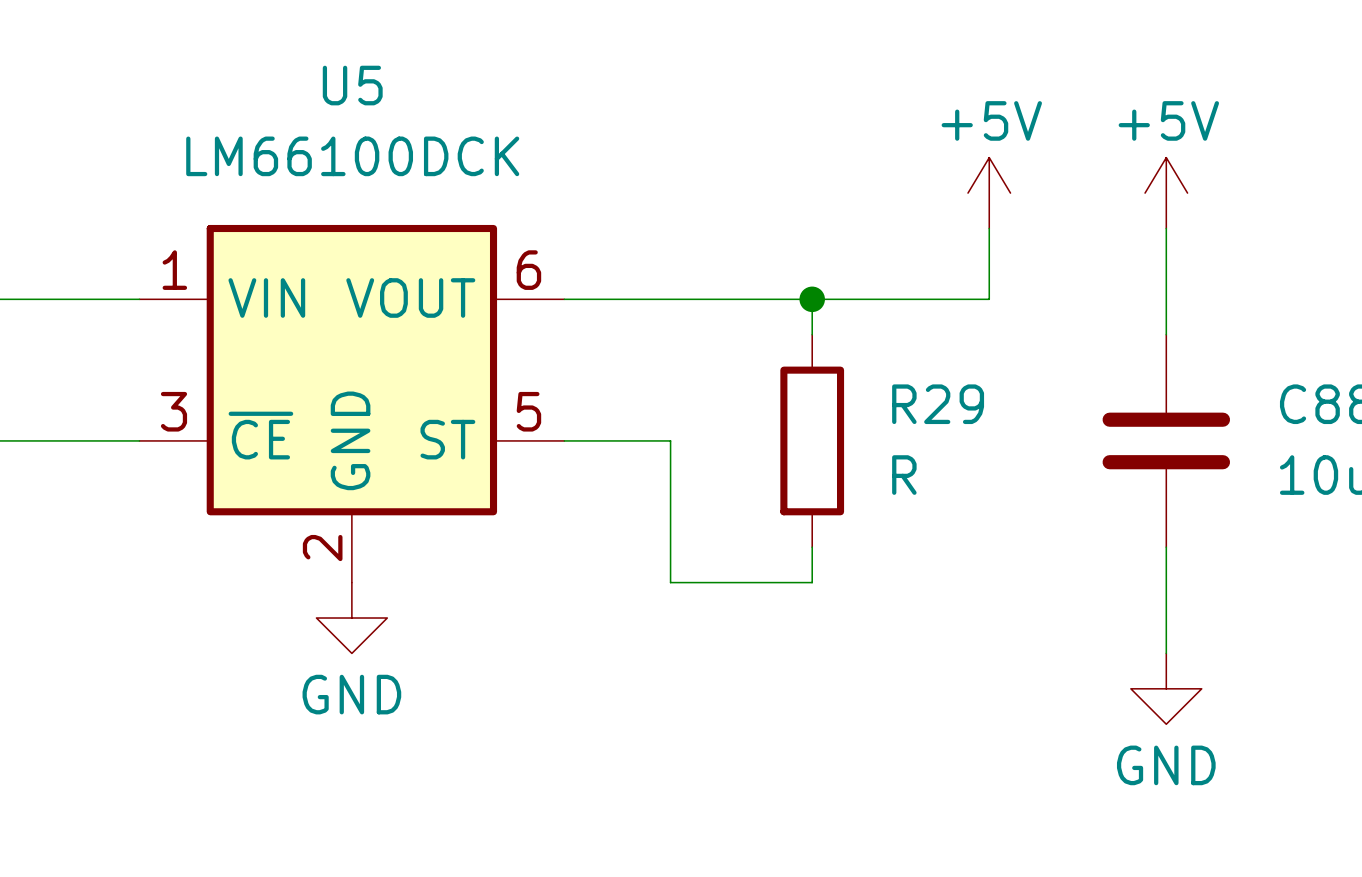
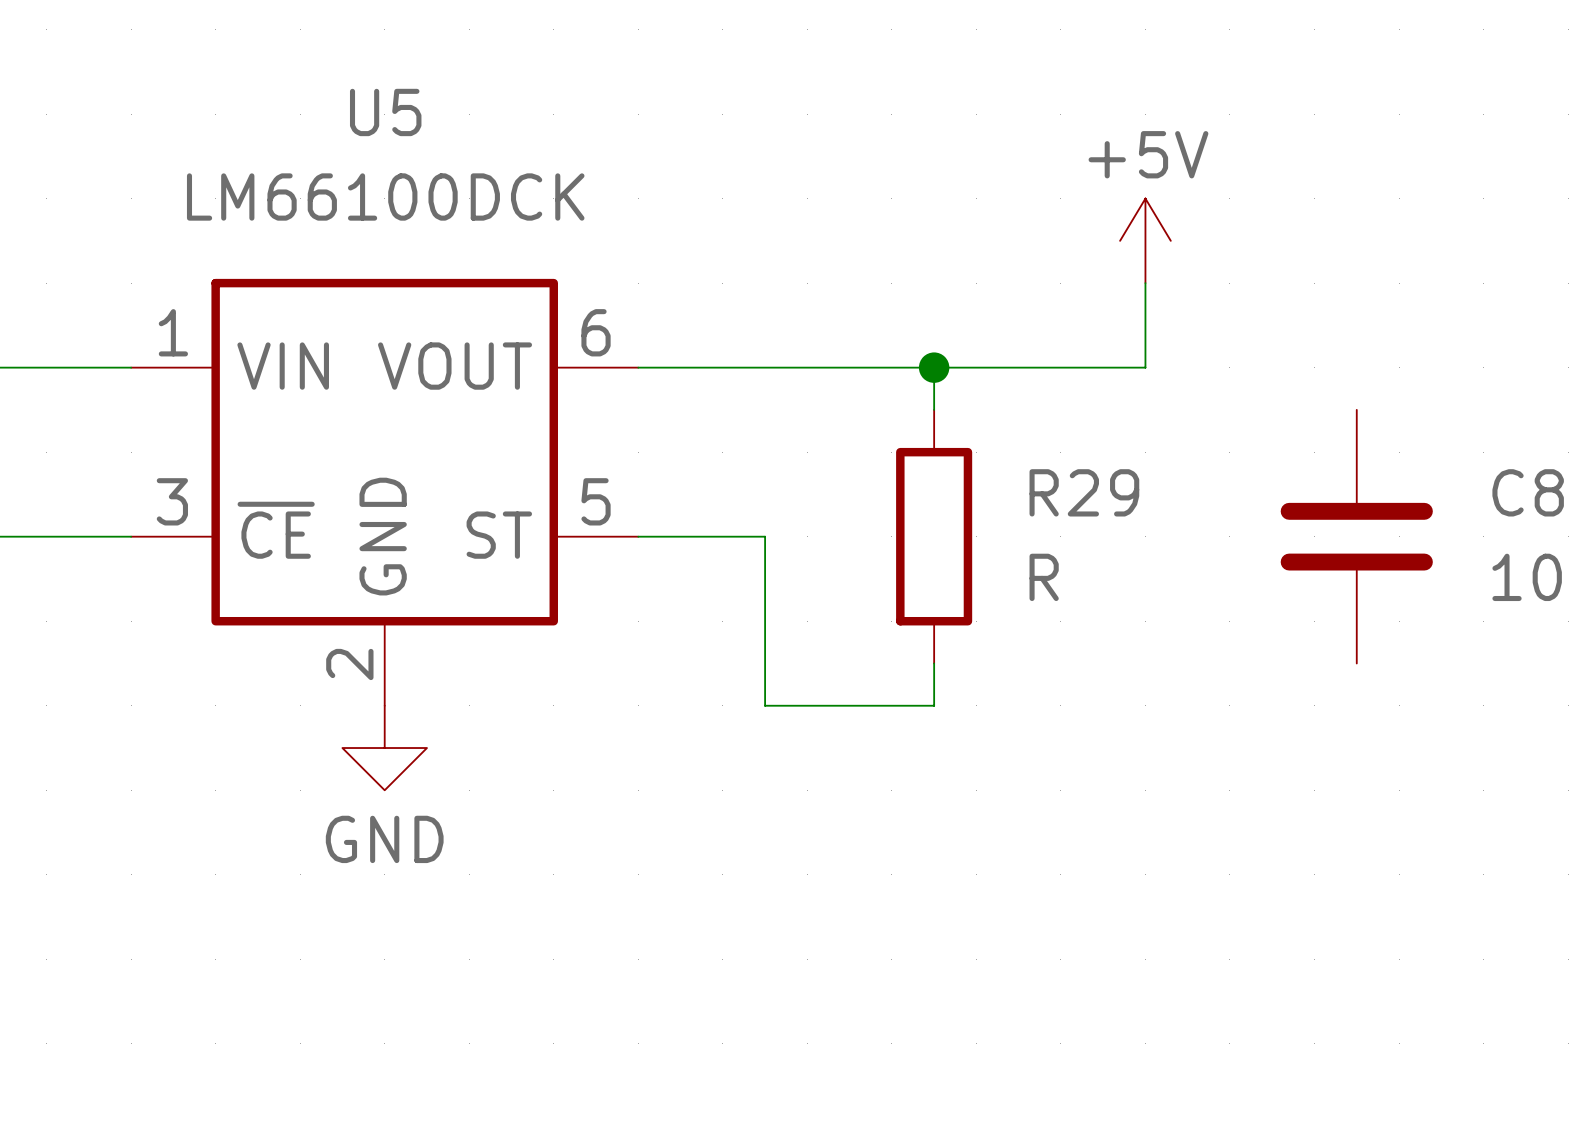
power symbol: +5V (1166, 193) -> none
wire: (1166, 228) (1166, 334) -> none
wire: (1166, 547) (1166, 653) -> none
power symbol: GND (1166, 688) -> none

